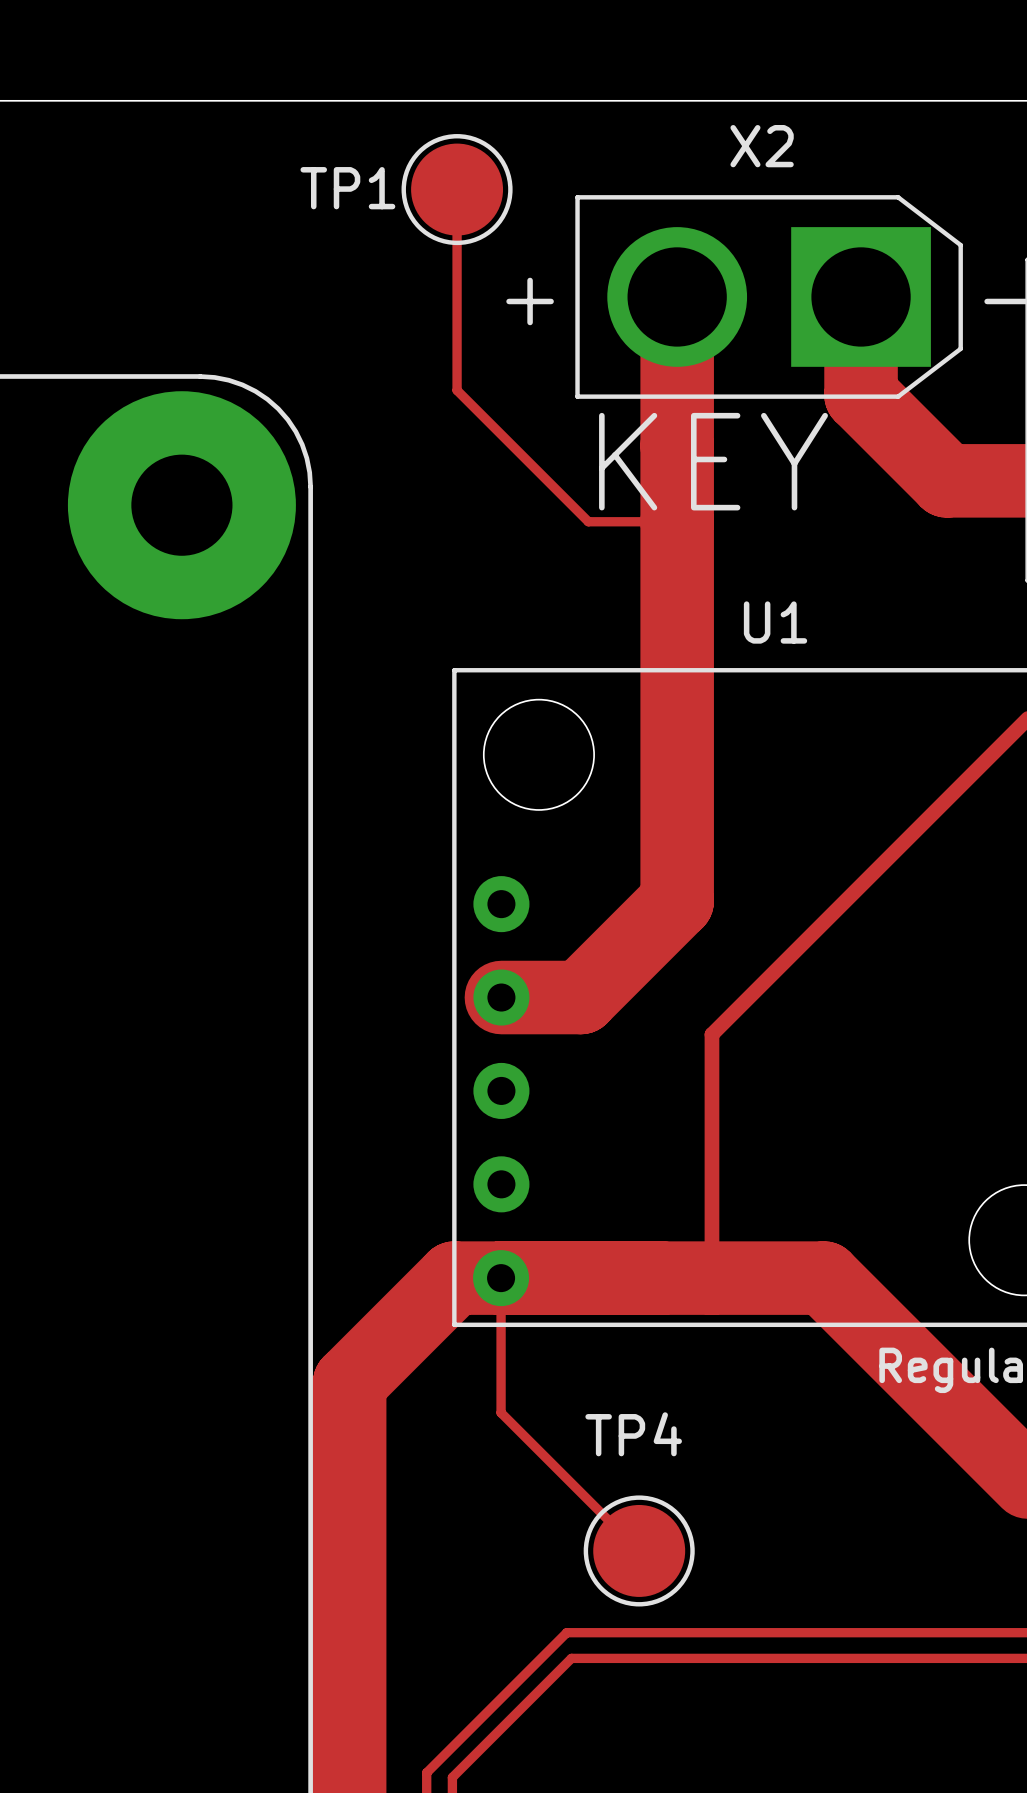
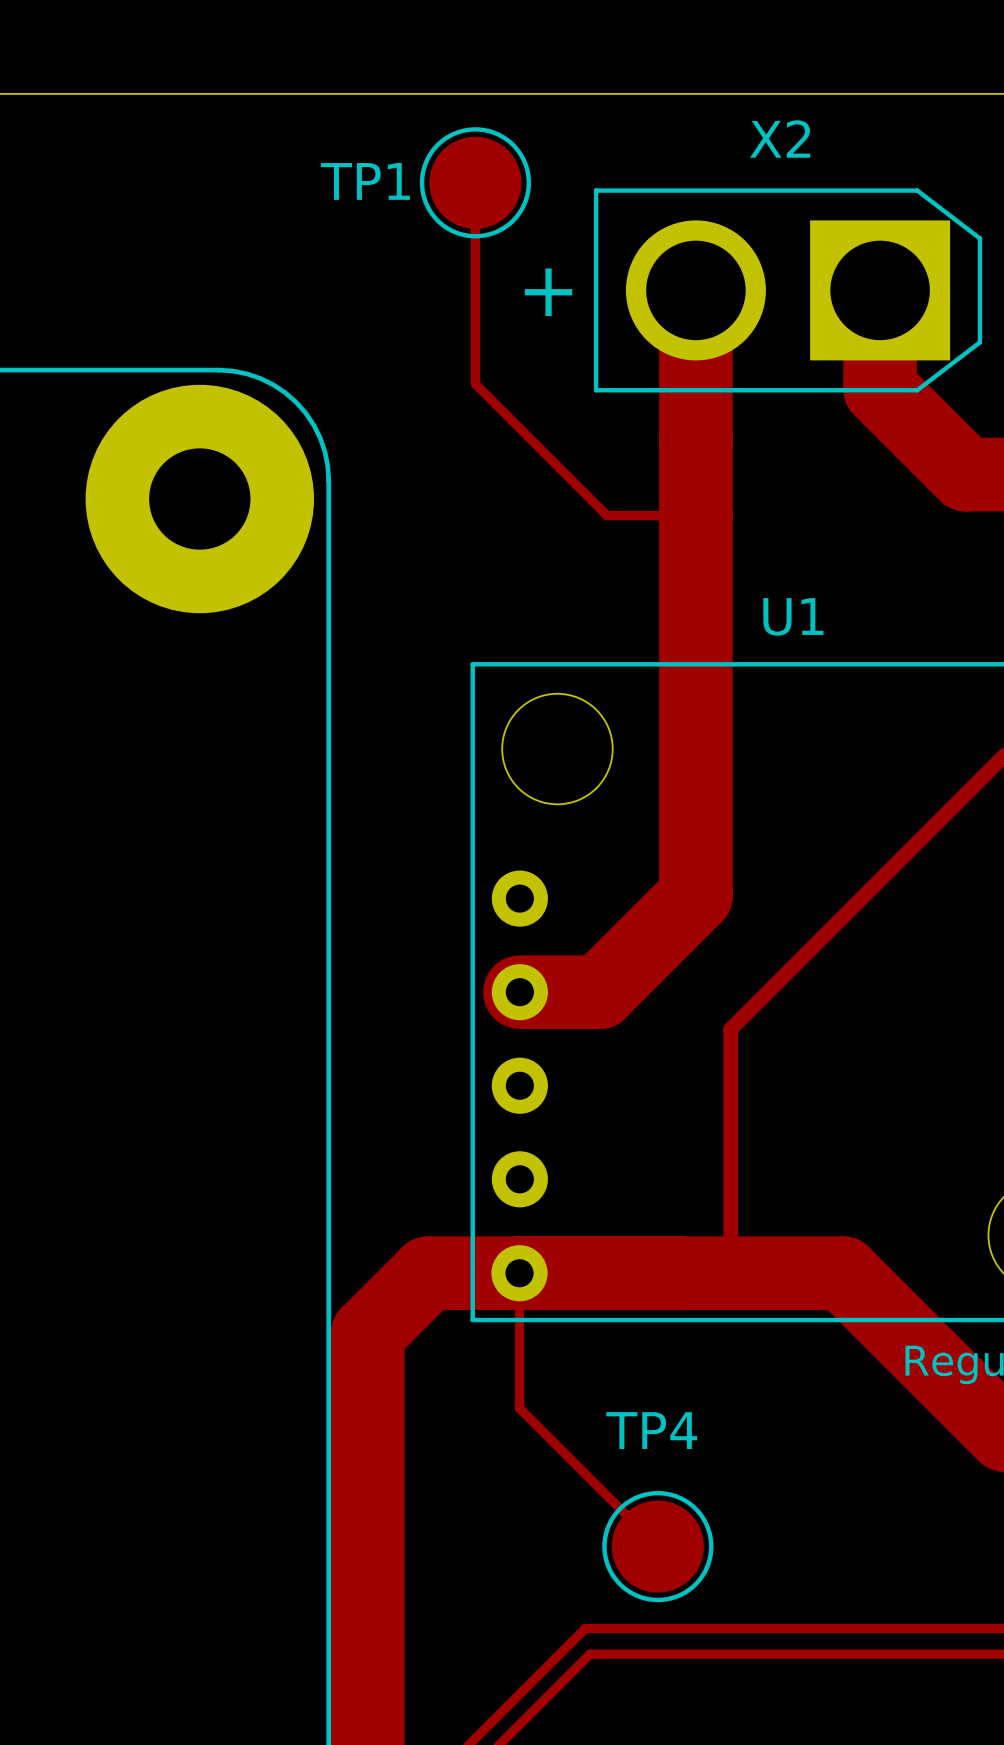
text: KEY (713, 461) -> none
track: (454, 1278) (349, 1382) -> (472, 1273) (428, 1273) (367, 1333) (367, 1378)

